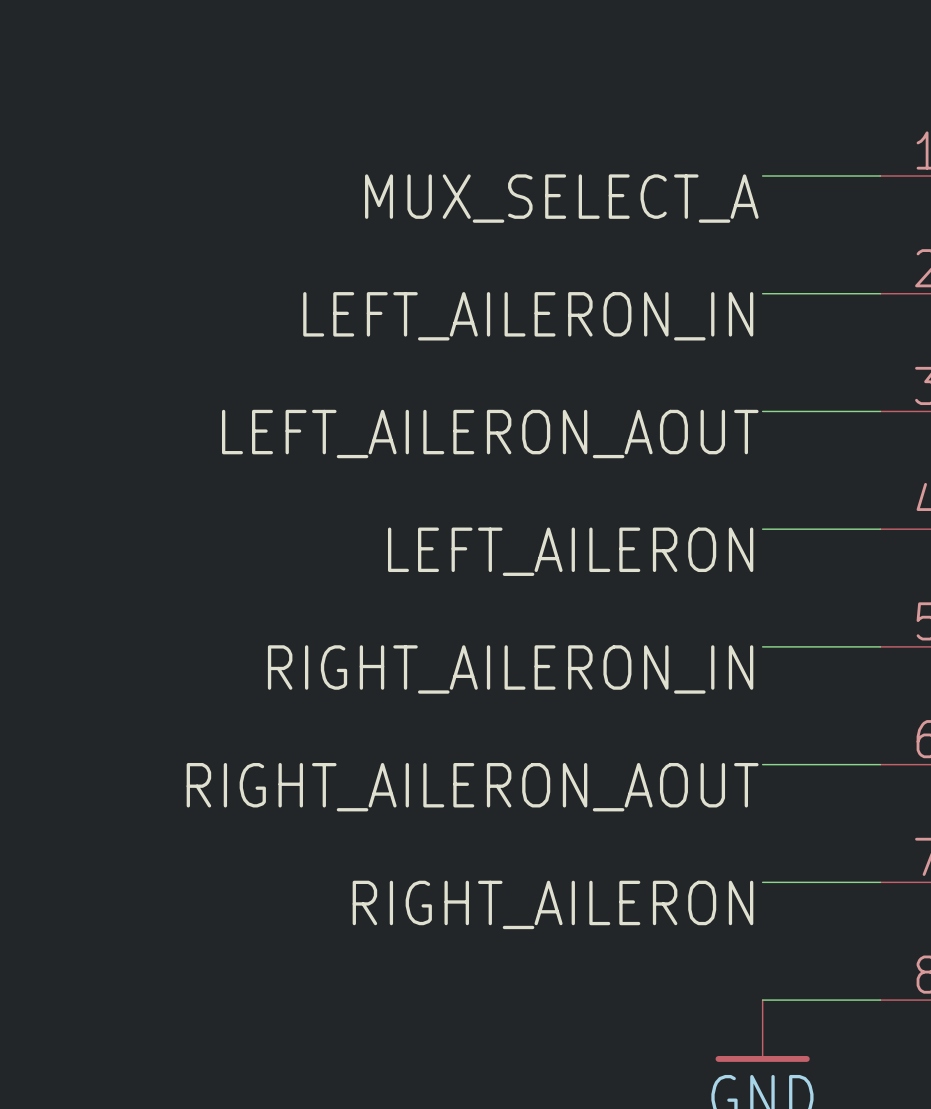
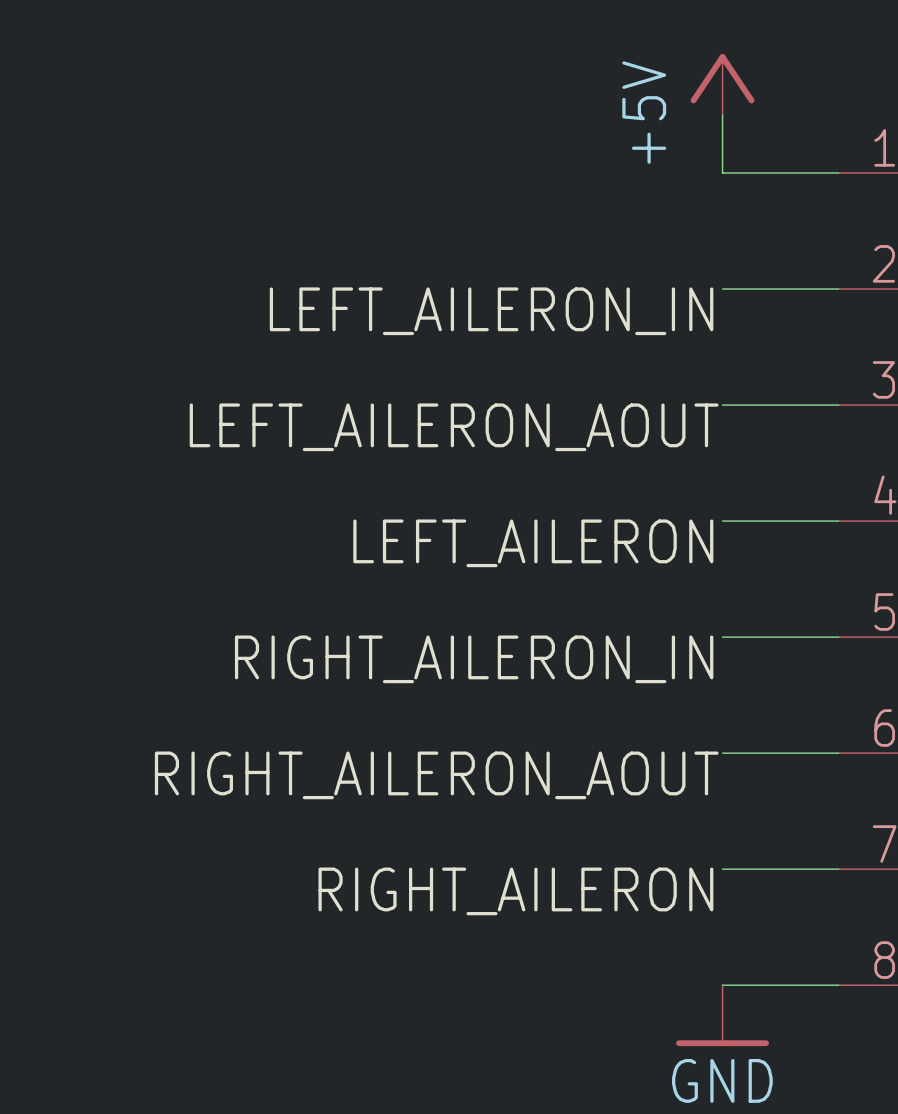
power symbol: none -> +5V (722, 84)
wire: none -> (722, 114) (722, 172)
label: MUX_SELECT_A (561, 198) -> none

